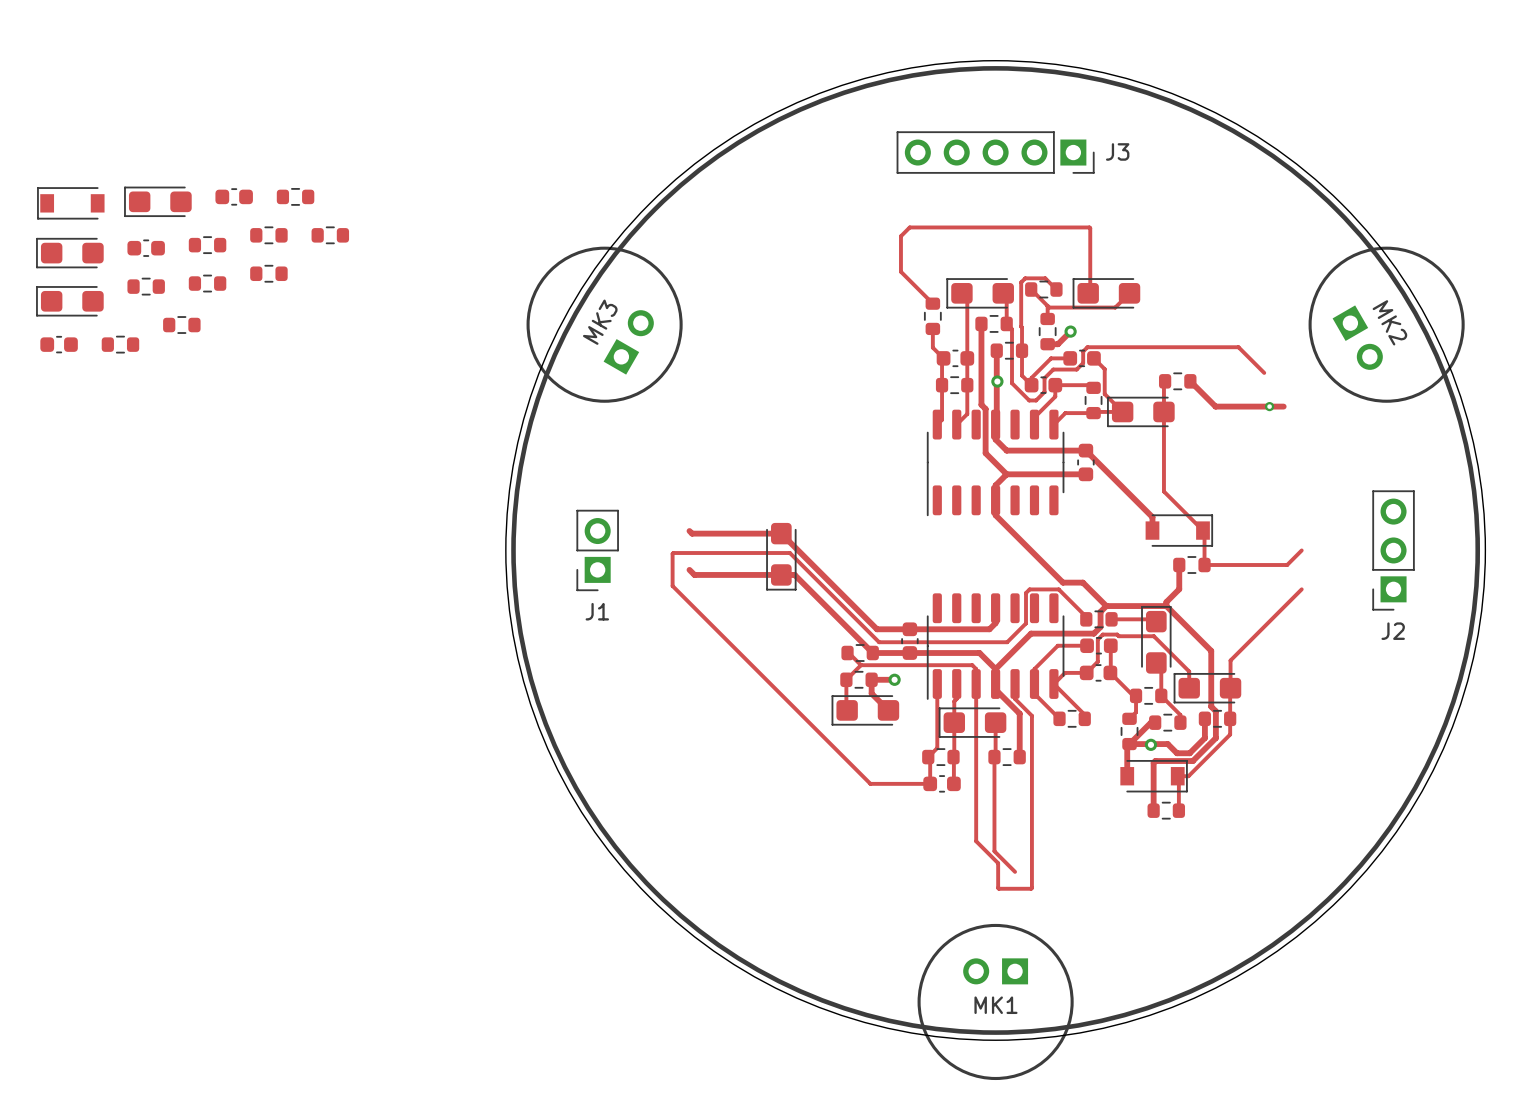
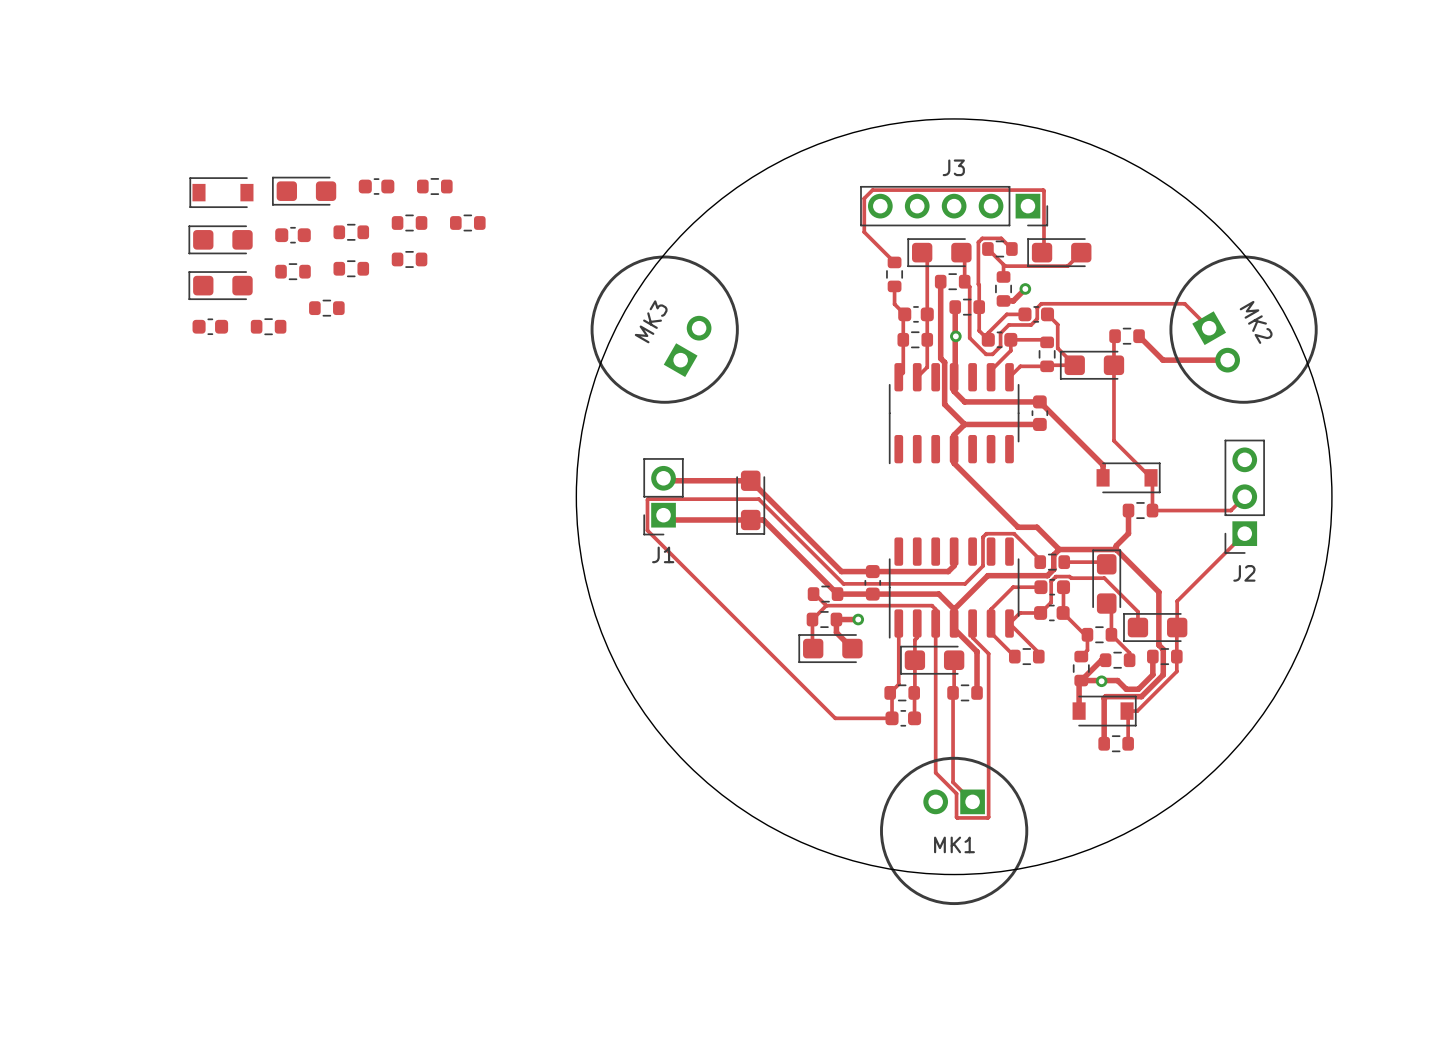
round board edge size: [505, 60, 1486, 1041] -> [575, 118, 1333, 875]
drawing: [511, 66, 1481, 1035] -> none
J3 name position: J3 (1117, 151) -> J3 (953, 167)
J3 position: (995, 152) -> (954, 206)
part: (234, 196) -> none
part: (295, 196) -> none
part: (157, 201) -> none
part position: (70, 203) -> (221, 192)
part: none -> (376, 186)
part: none -> (434, 186)
part: none -> (304, 191)
part: (268, 235) -> none
part: (330, 235) -> none
part: (207, 245) -> none
part: (146, 248) -> none
part: (69, 253) -> none
part: none -> (409, 222)
part: none -> (467, 222)
part: none -> (351, 232)
part: (268, 273) -> none
part: none -> (293, 235)
part: none -> (220, 239)
part: (207, 283) -> none
part: (146, 286) -> none
part: none -> (409, 259)
part: (69, 301) -> none
part: none -> (351, 268)
part: none -> (293, 271)
MK3 name position: MK3 (600, 322) -> MK3 (651, 321)
MK2 name position: MK2 (1389, 322) -> MK2 (1256, 322)
MK3 position: (604, 324) -> (664, 329)
MK2 position: (1386, 324) -> (1243, 329)
part: (181, 325) -> none
part: none -> (220, 285)
part: (59, 344) -> none
part: (120, 344) -> none
part: none -> (326, 308)
part: none -> (210, 326)
part: none -> (268, 326)
via: (1269, 406) -> none
J1 position: (597, 550) -> (663, 496)
J2 position: (1393, 550) -> (1244, 496)
MK1 position: (995, 1001) -> (954, 830)
MK1 name position: MK1 (995, 1005) -> MK1 (954, 844)

